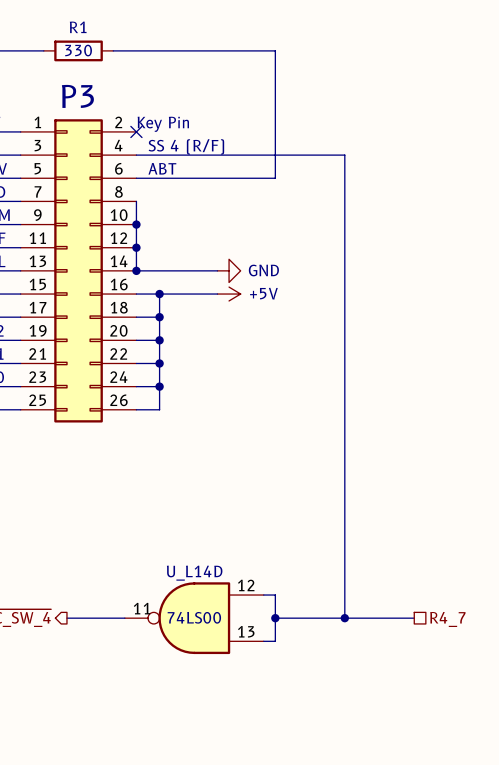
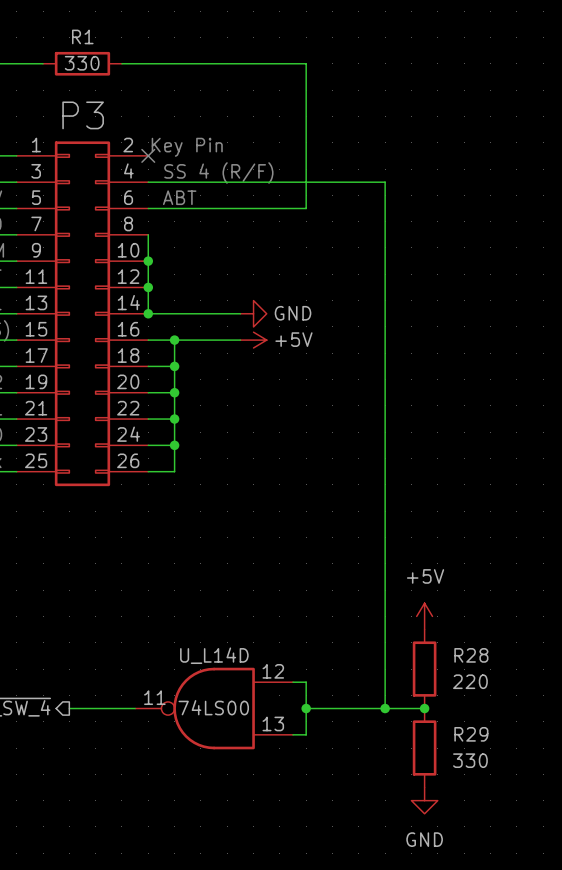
power symbol: none -> +5V (424, 616)
R28: none -> 220 (424, 669)
wire: (379, 618) (414, 618) -> none
junction: none -> (424, 708)
hierarchical label: R4_7 (447, 619) -> none
R29: none -> 330 (424, 748)
power symbol: none -> GND (424, 800)

